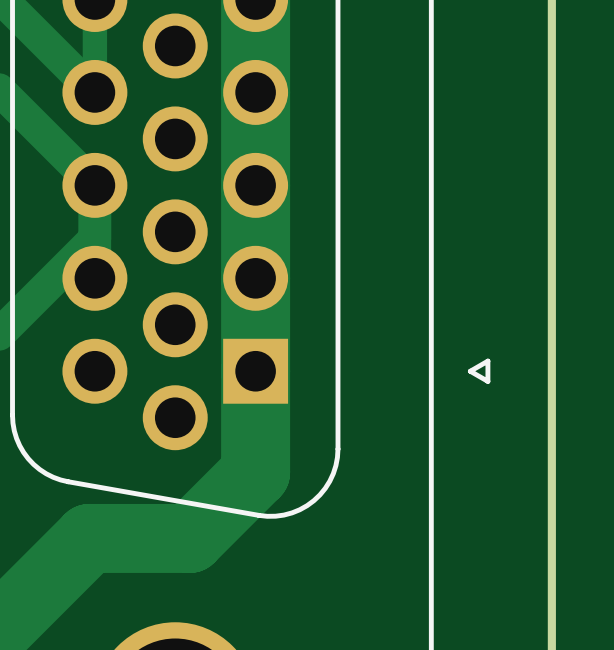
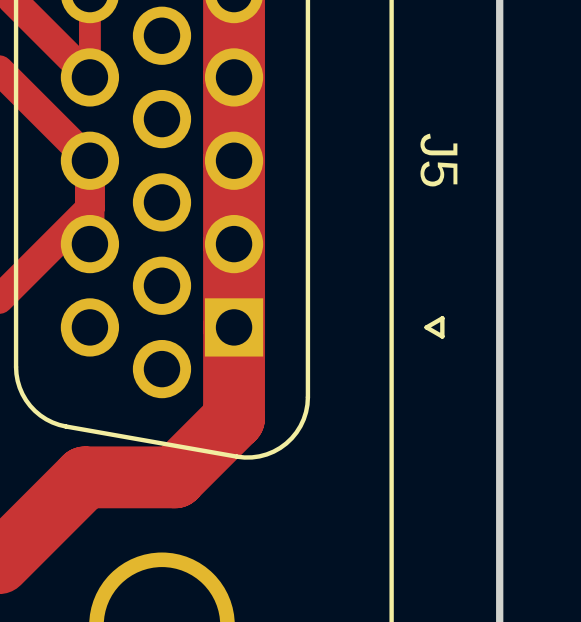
J5 name: none -> J5 (438, 160)

